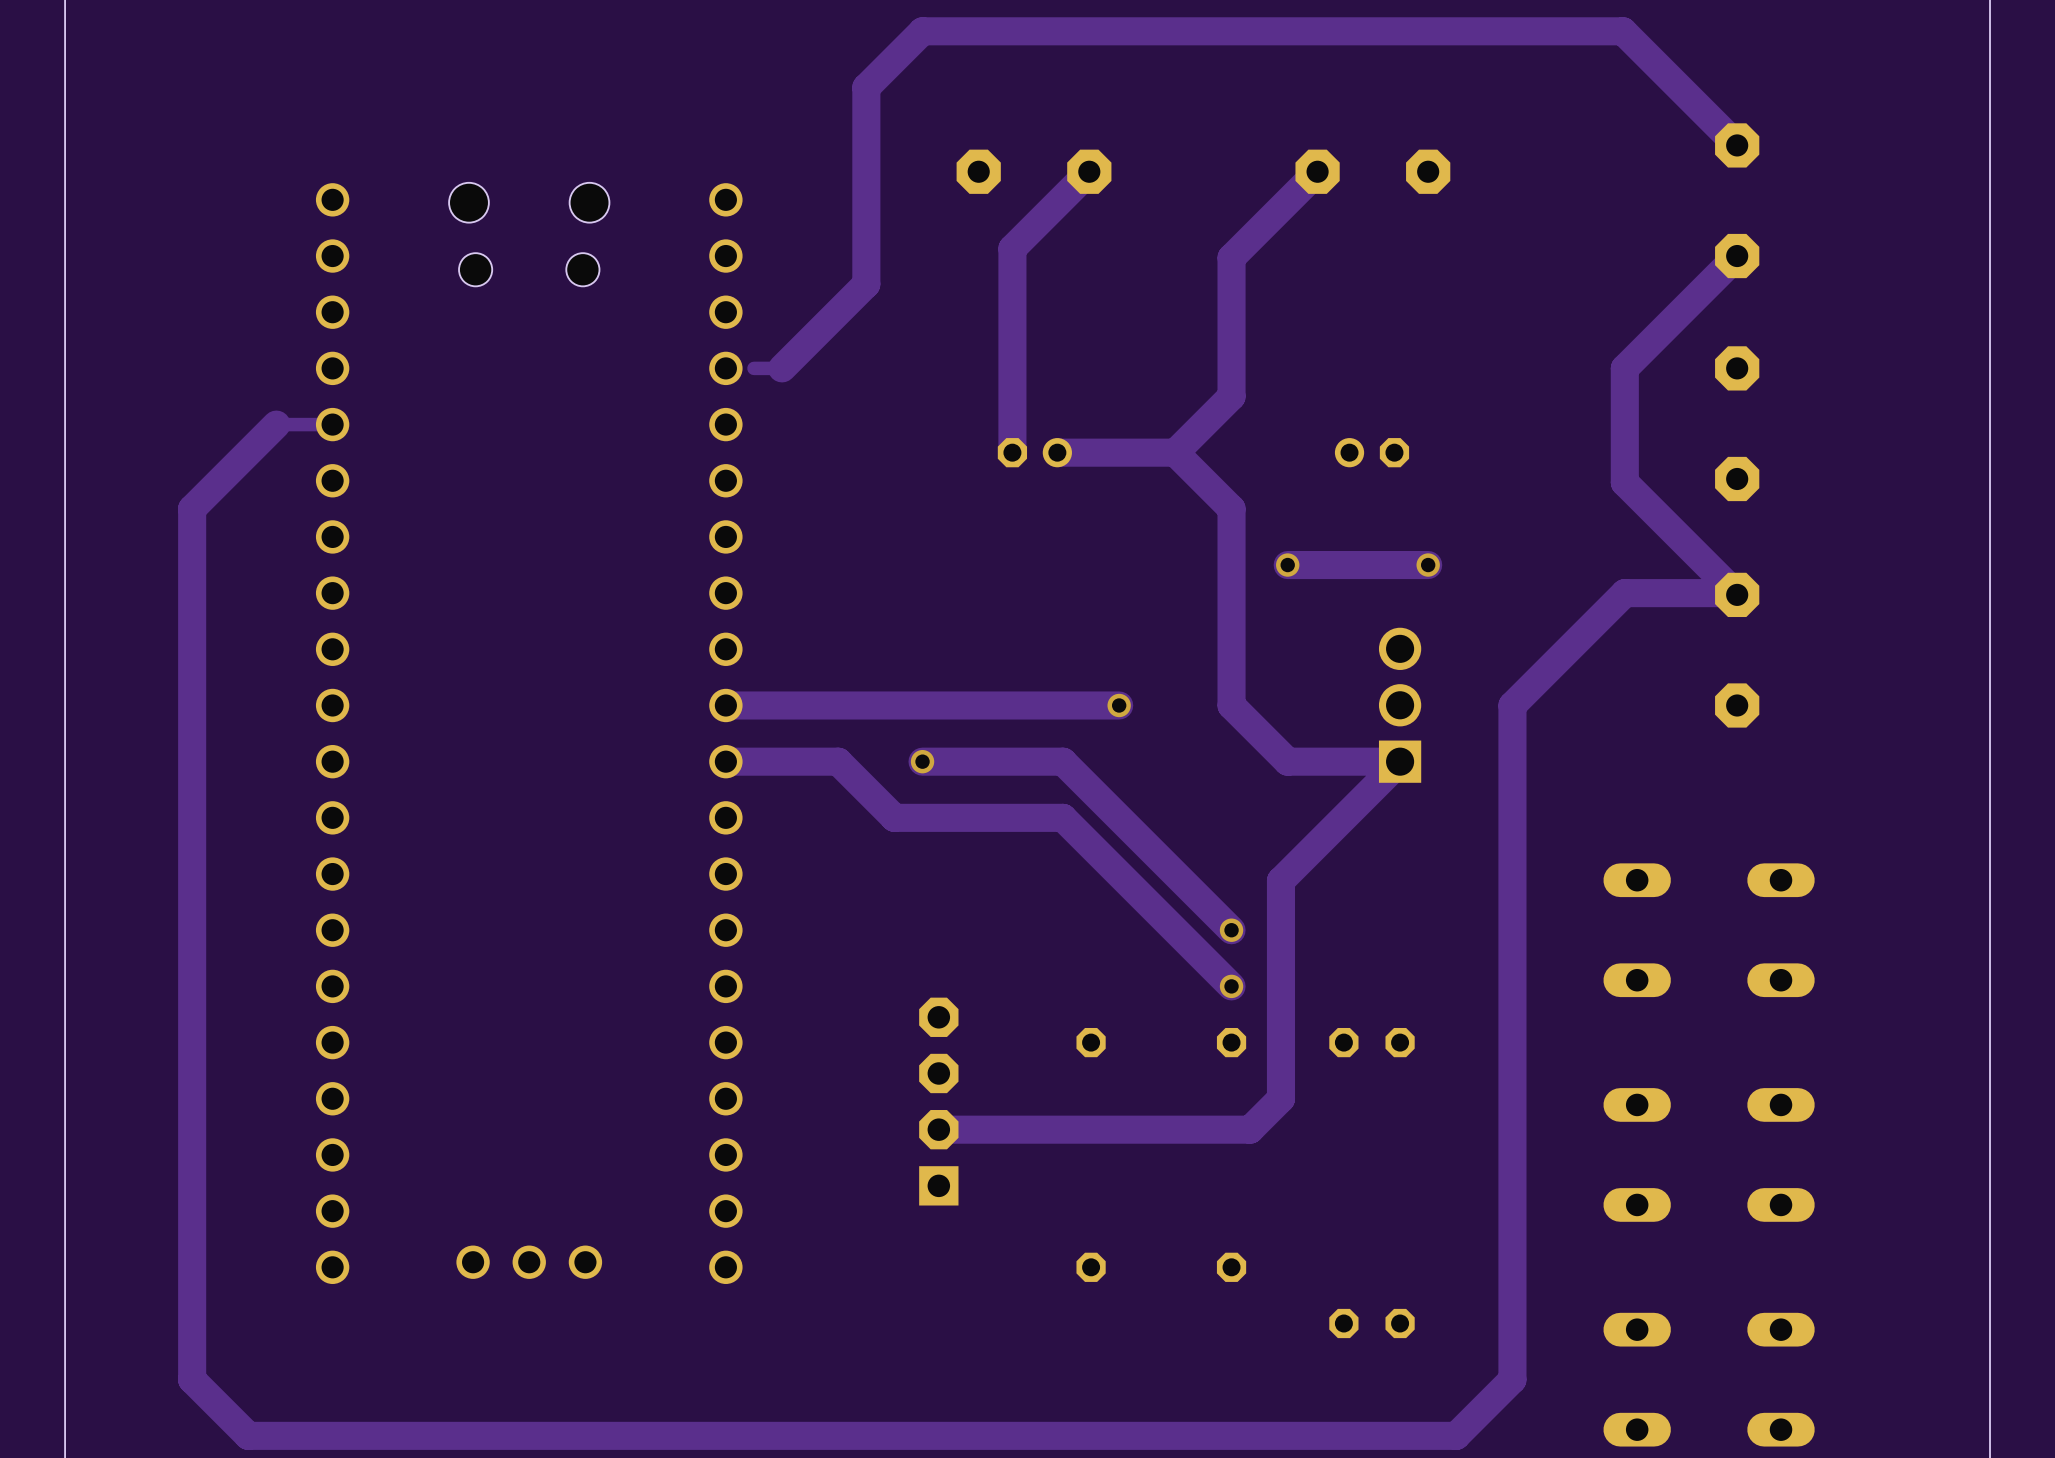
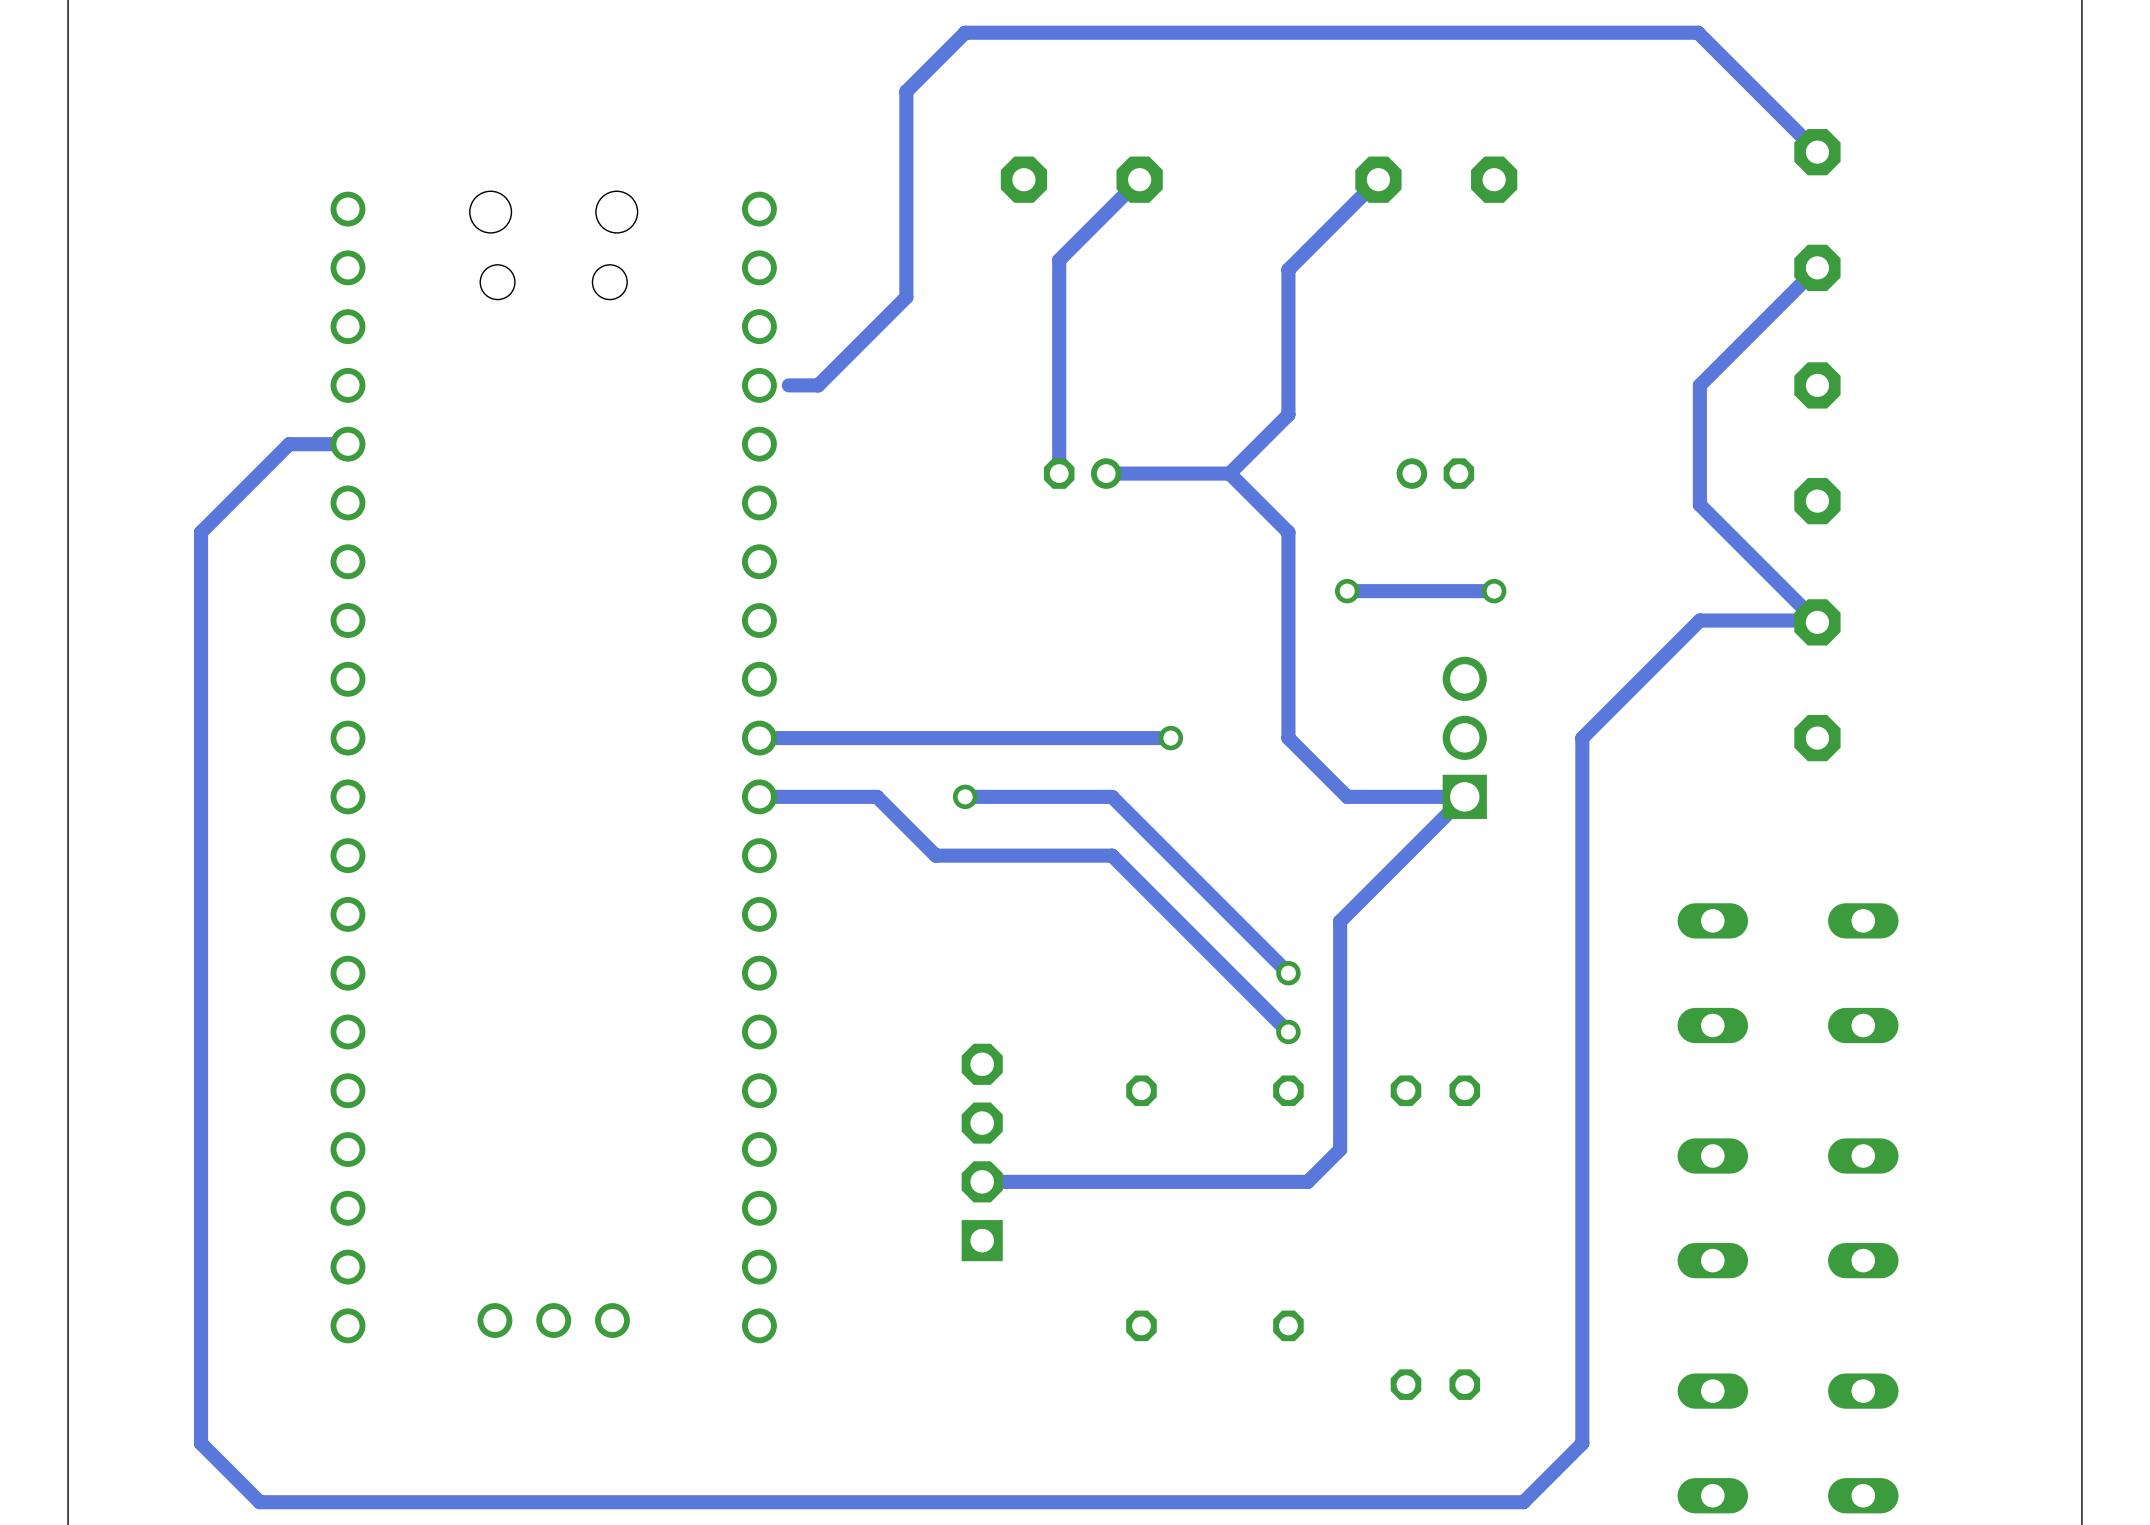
track width: thick (1737, 145) (1623, 31) (922, 31) (866, 87) (866, 284) (782, 368) -> thin (1817, 152) (1698, 32) (965, 32) (906, 91) (906, 297) (818, 385)
track width: thick (1089, 171) (1012, 248) (1012, 452) -> thin (1139, 179) (1059, 260) (1059, 473)
track width: thick (1317, 171) (1231, 257) (1231, 396) (1175, 452) -> thin (1378, 179) (1288, 269) (1288, 414) (1229, 473)
track width: thick (1737, 256) (1624, 368) (1624, 482) (1736, 594) -> thin (1817, 267) (1699, 385) (1699, 504) (1816, 621)
track width: thick (276, 424) (192, 508) (192, 1379) (248, 1435) (1456, 1435) (1512, 1379) (1512, 705) (1624, 593) (1737, 593) -> thin (289, 444) (201, 532) (201, 1443) (259, 1502) (1523, 1502) (1582, 1443) (1582, 738) (1699, 620) (1817, 620)
track width: thick (1175, 452) (1057, 452) -> thin (1229, 473) (1106, 473)
track width: thick (1175, 452) (1231, 508) (1231, 705) (1287, 761) (1400, 761) (1280, 880) (1280, 1098) (1250, 1129) (938, 1129) -> thin (1229, 473) (1288, 532) (1288, 738) (1347, 796) (1464, 796) (1340, 921) (1340, 1149) (1307, 1181) (982, 1181)
track width: thick (1428, 565) (1287, 565) -> thin (1494, 591) (1347, 591)
track width: thick (1119, 705) (725, 705) -> thin (1170, 738) (759, 738)
track width: thick (725, 761) (838, 761) (894, 817) (1062, 817) (1231, 986) -> thin (759, 796) (876, 796) (935, 855) (1112, 855) (1288, 1031)
track width: thick (922, 761) (1062, 761) (1231, 930) -> thin (965, 796) (1112, 796) (1288, 973)

